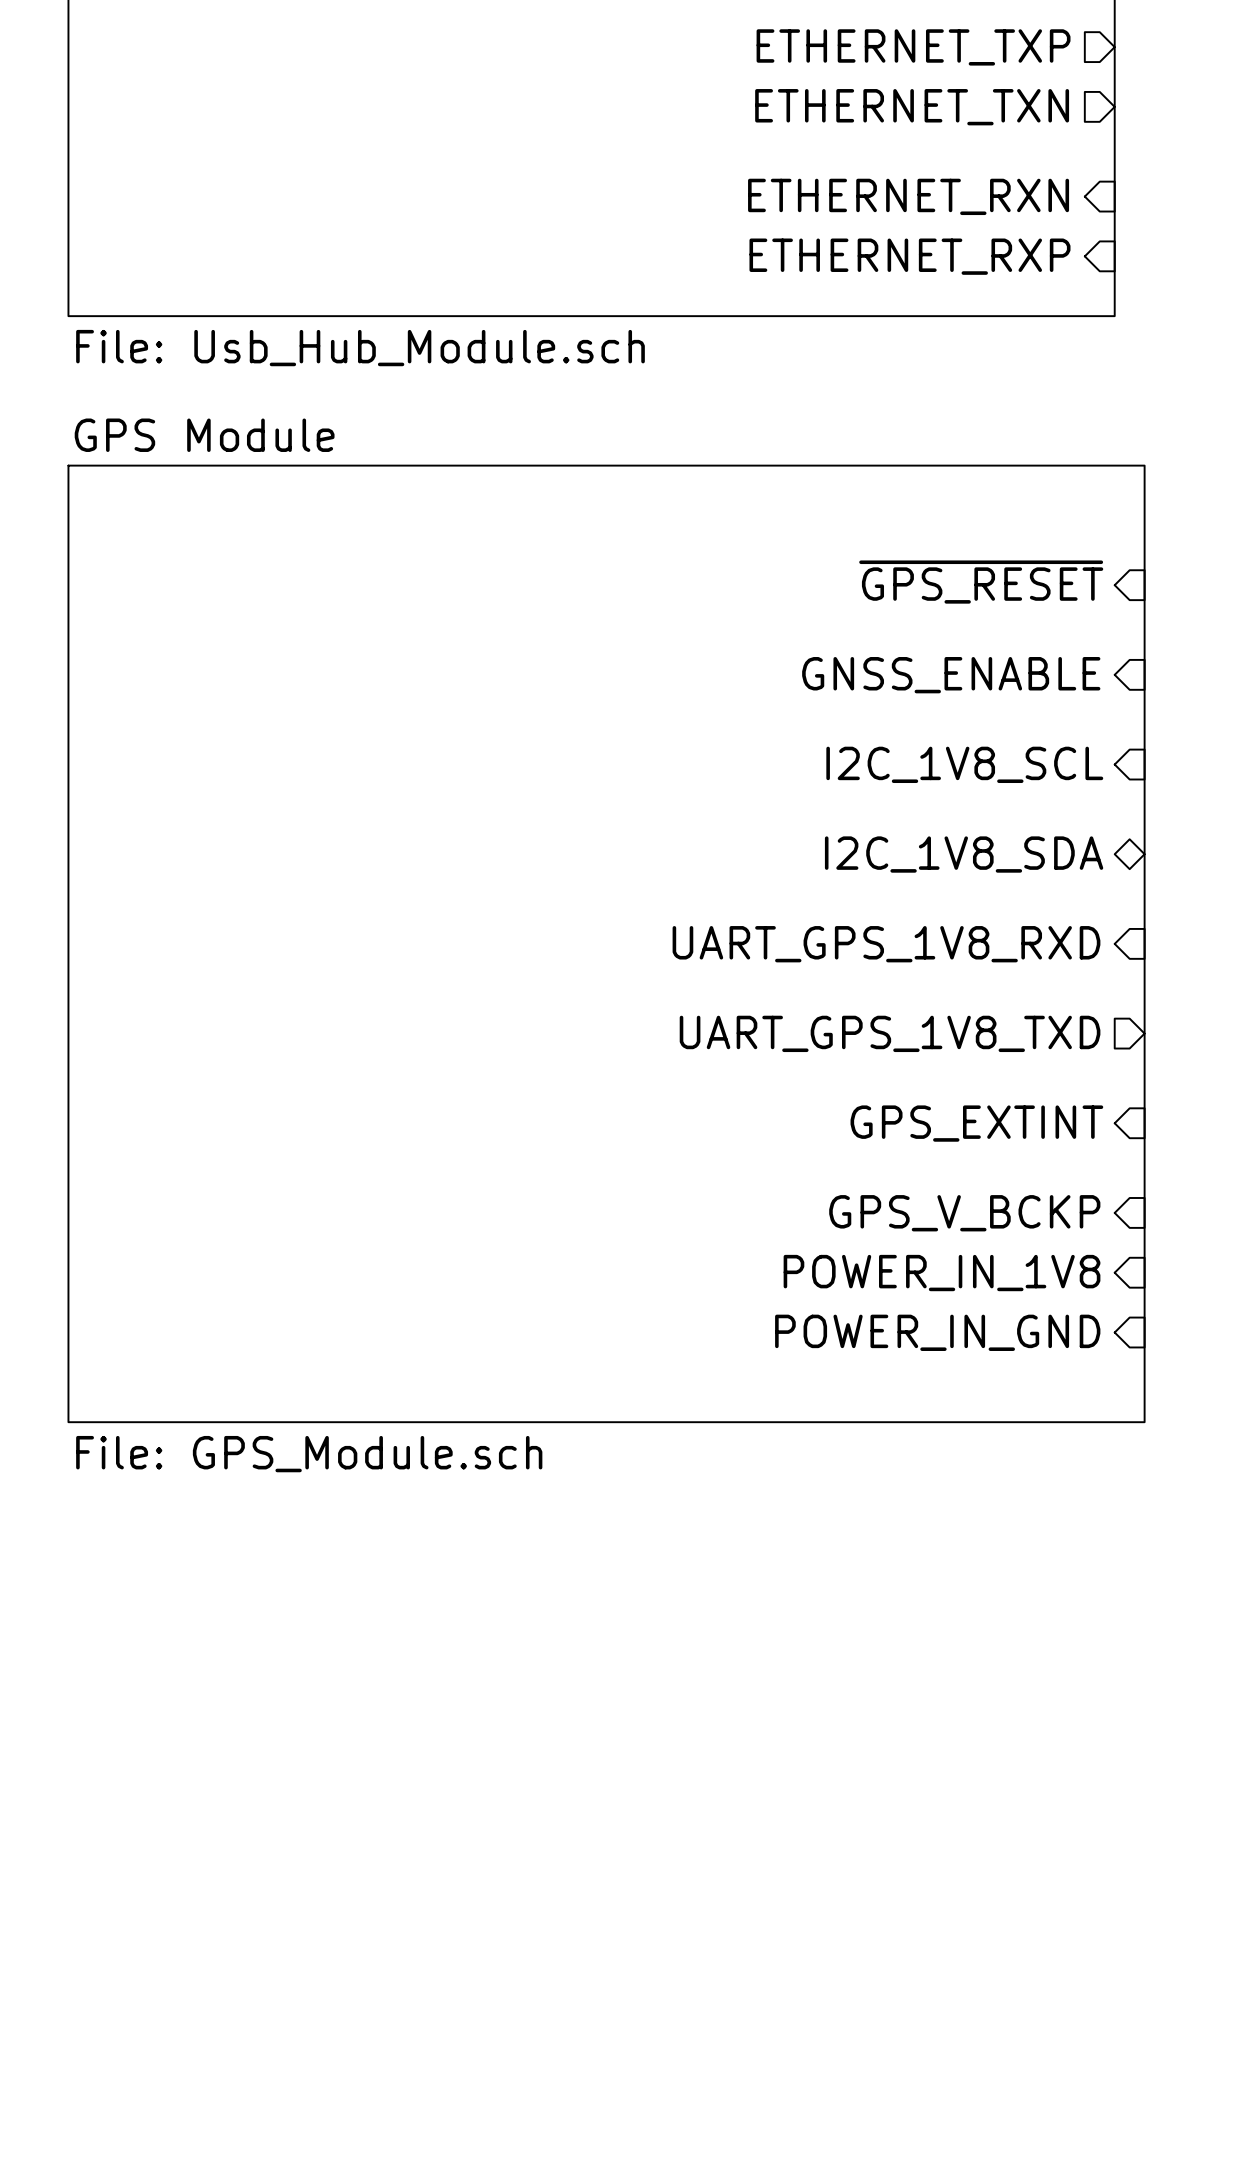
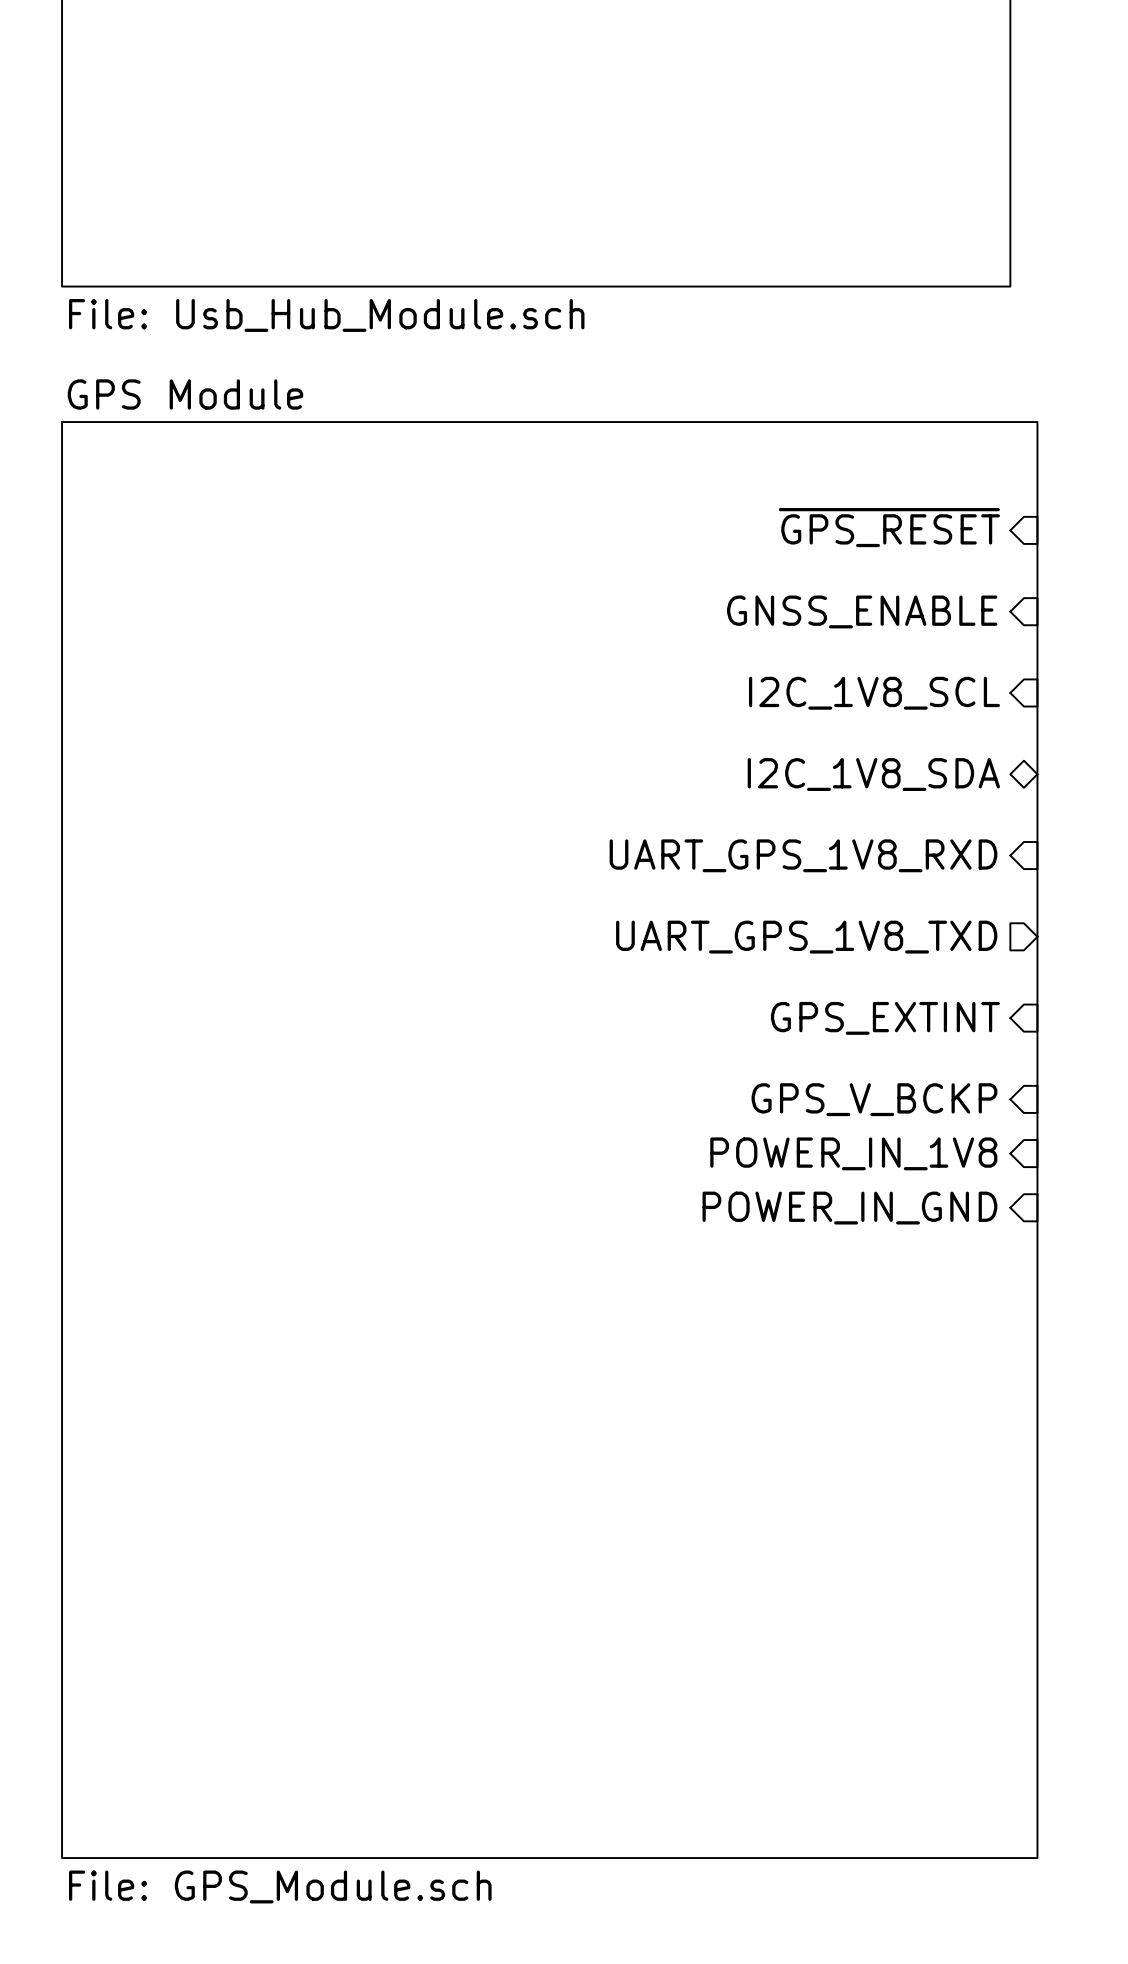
sheet pin: ETHERNET_TXP (913, 47) -> none
sheet pin: ETHERNET_TXN (912, 107) -> none
sheet pin: ETHERNET_RXN (908, 196) -> none
sheet pin: ETHERNET_RXP (909, 256) -> none
sheet GPS Module: File: GPS_Module.sch (606, 943) -> none
sheet GPS Module: none -> File: GPS_Module.sch (549, 1140)

